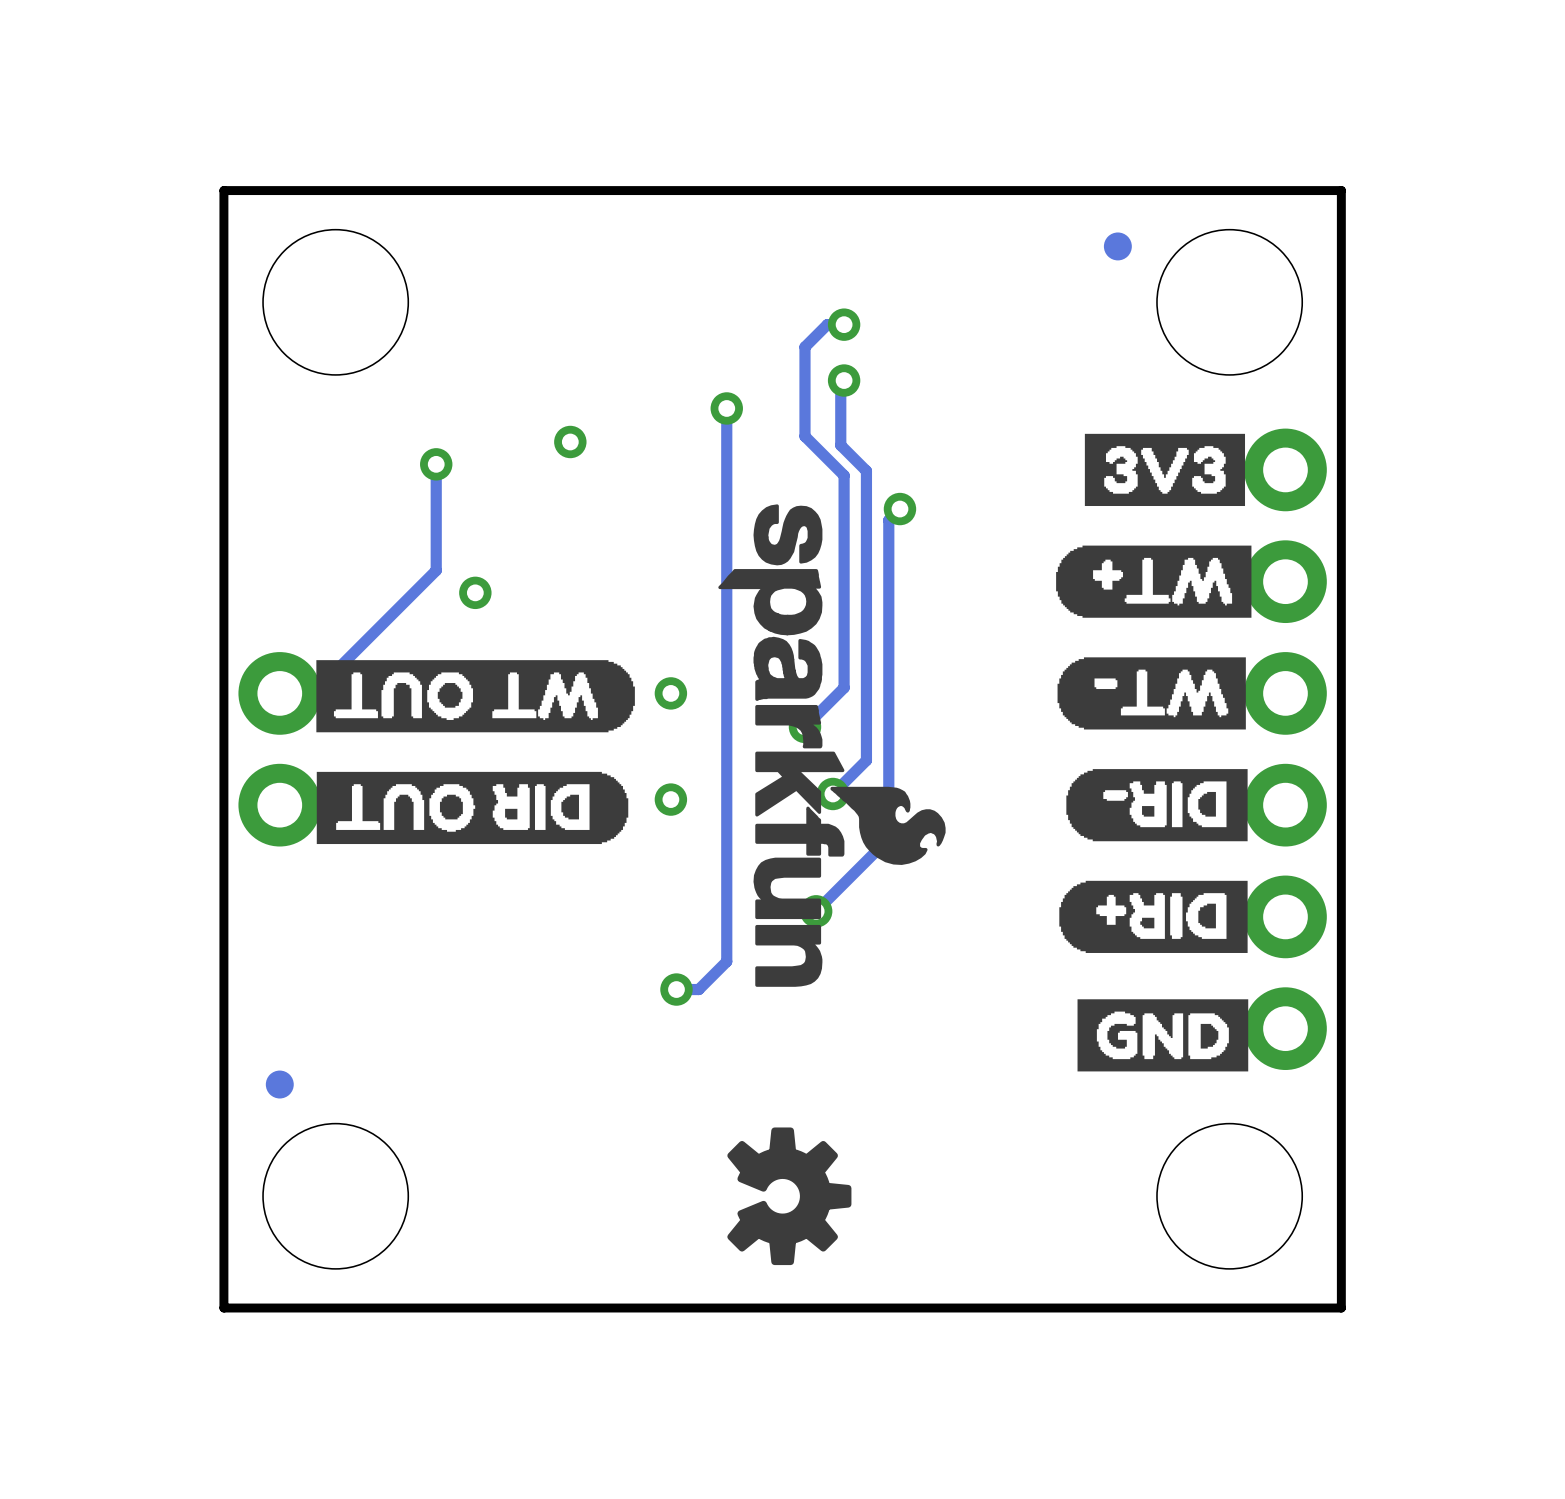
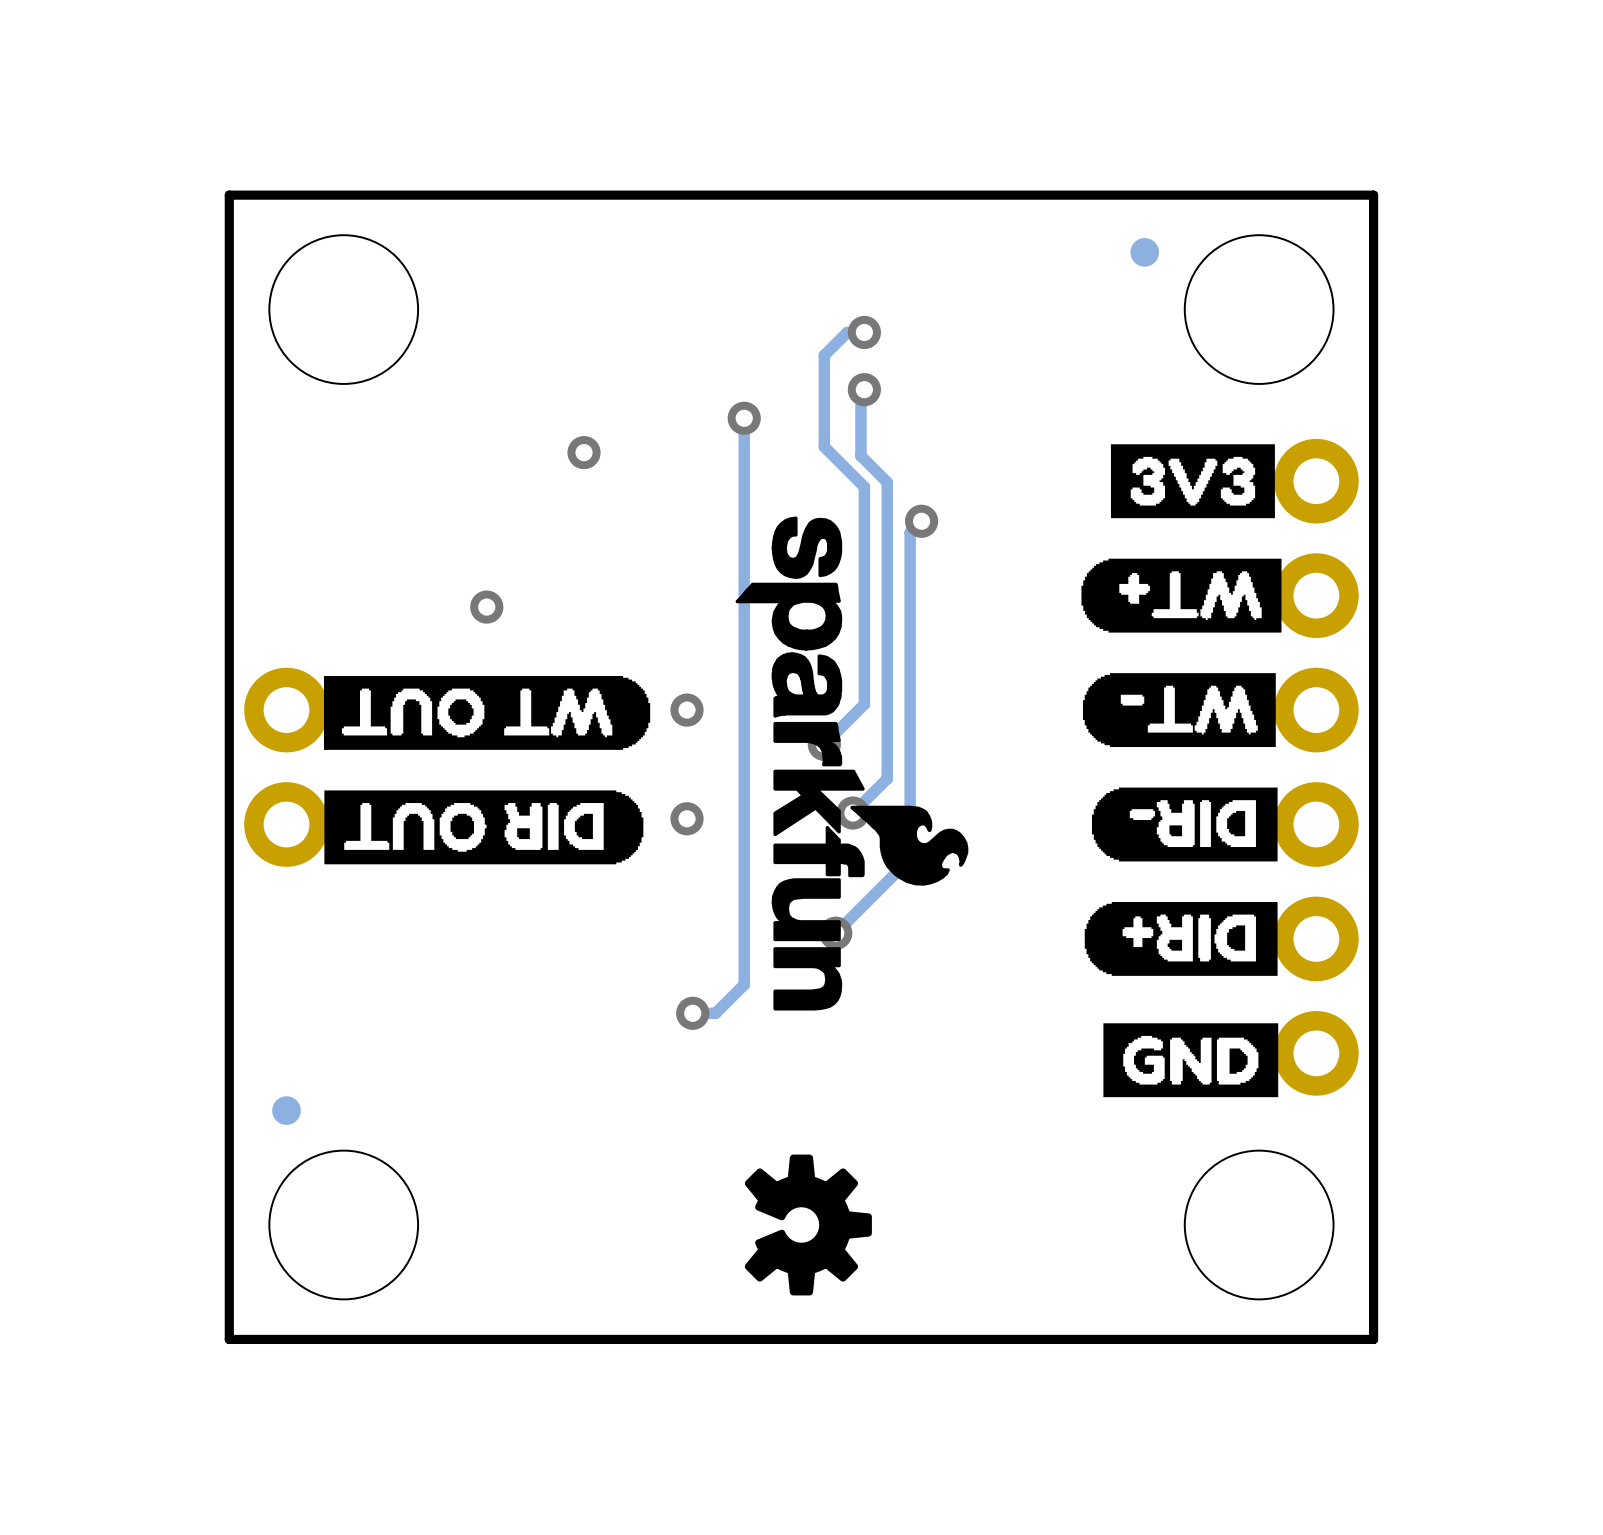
track: (436, 464) (436, 570) (313, 693) -> none
via: (436, 464) -> none

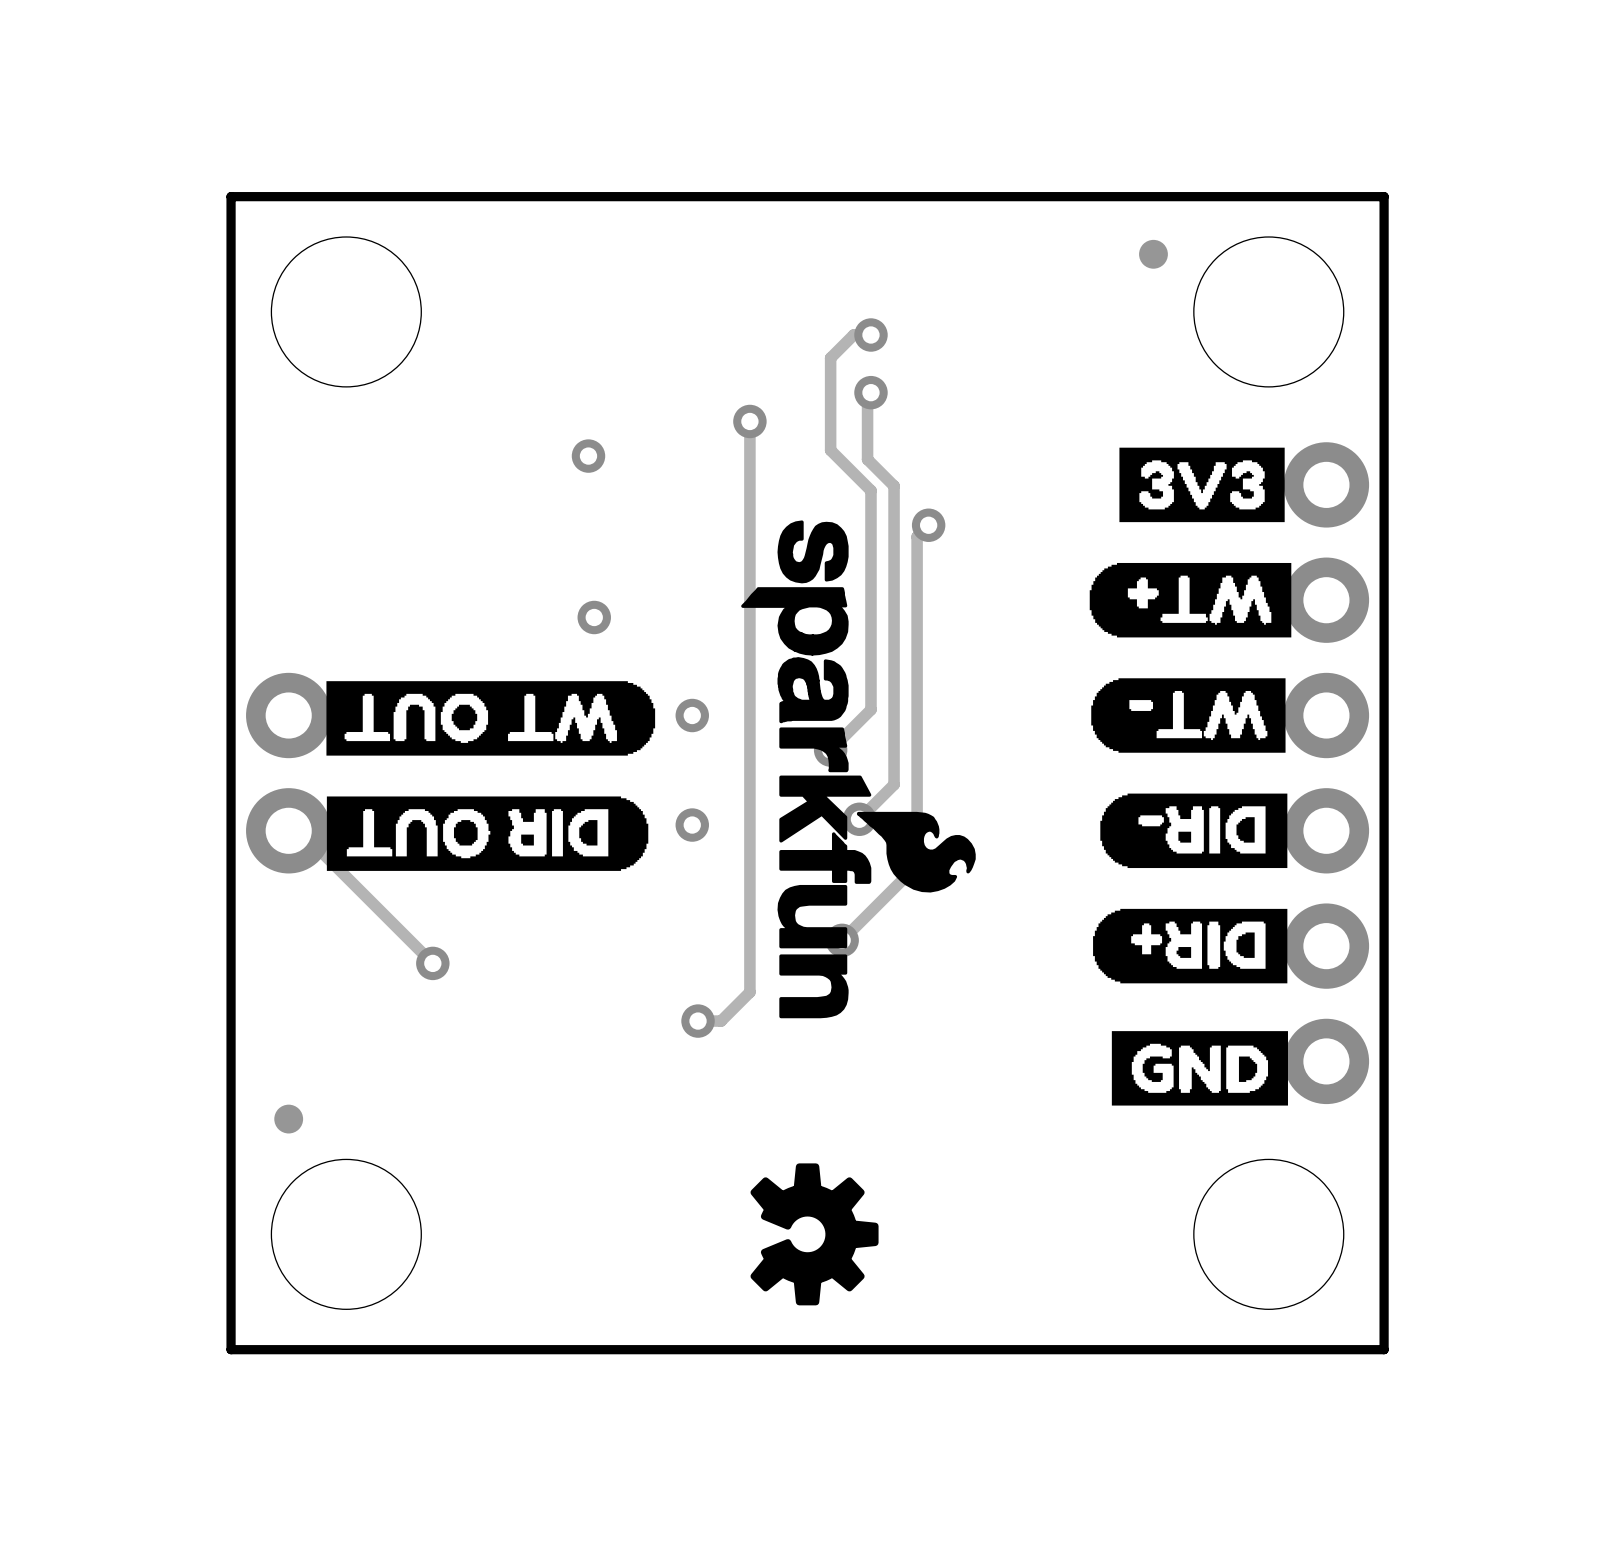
via position: (486, 607) -> (594, 617)
track: none -> (288, 830) (300, 830) (432, 963)
via: none -> (432, 963)

